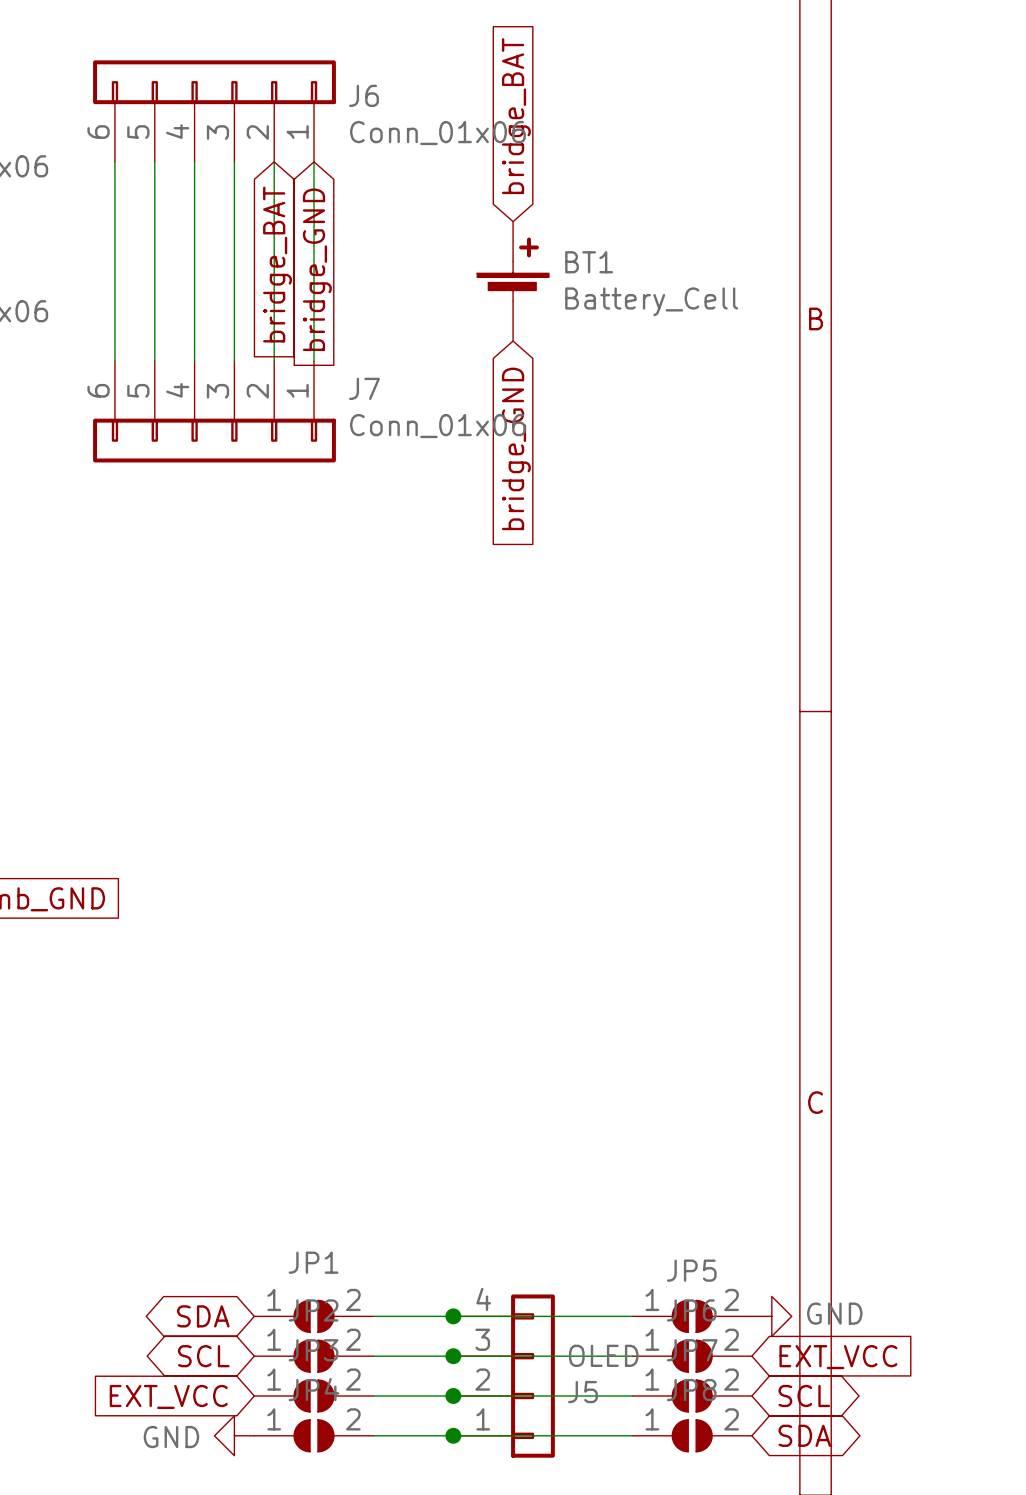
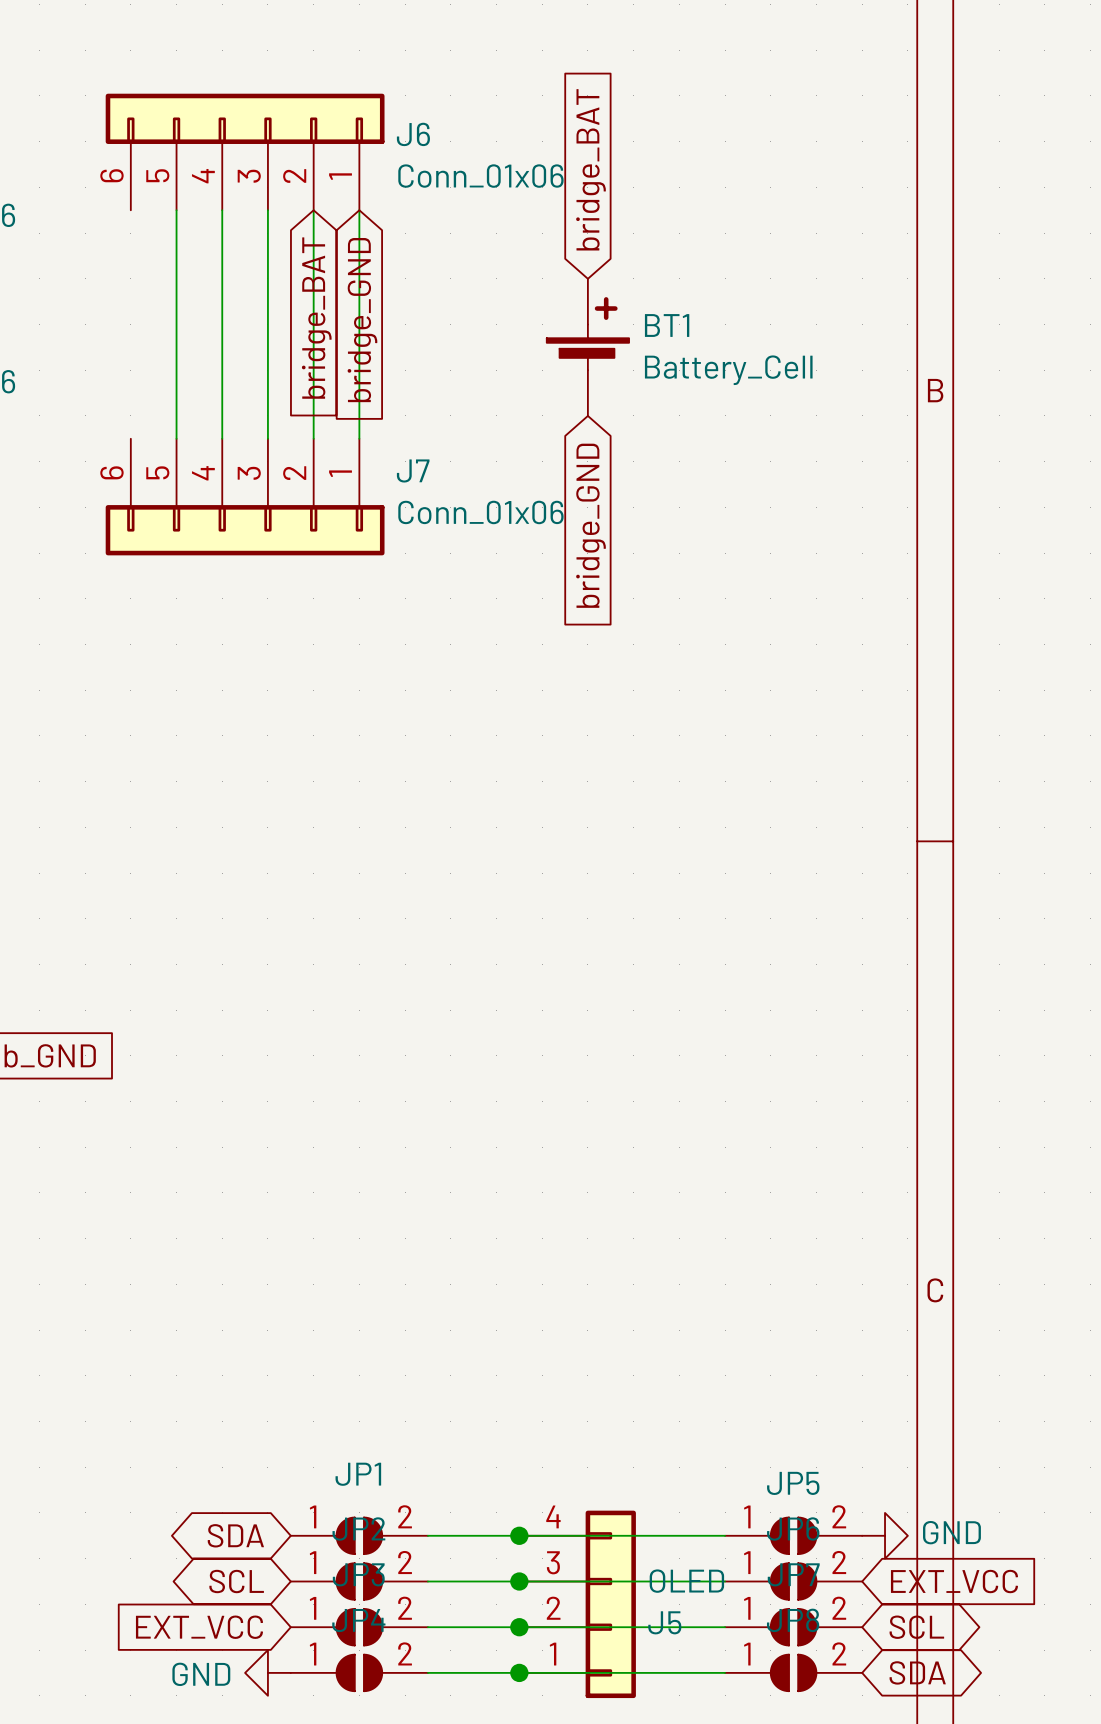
wire: (114, 161) (114, 360) -> none

